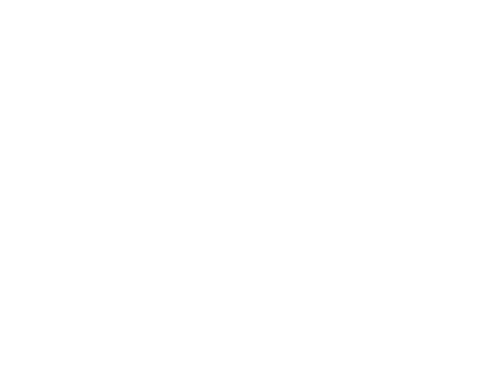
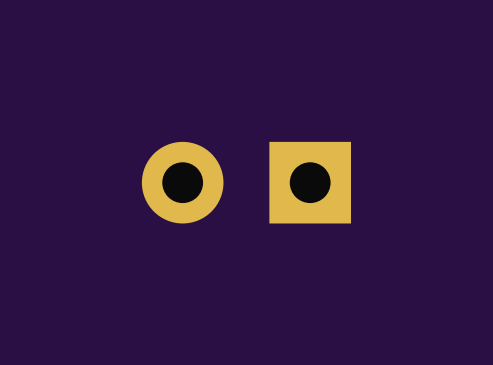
part: none -> (246, 182)

